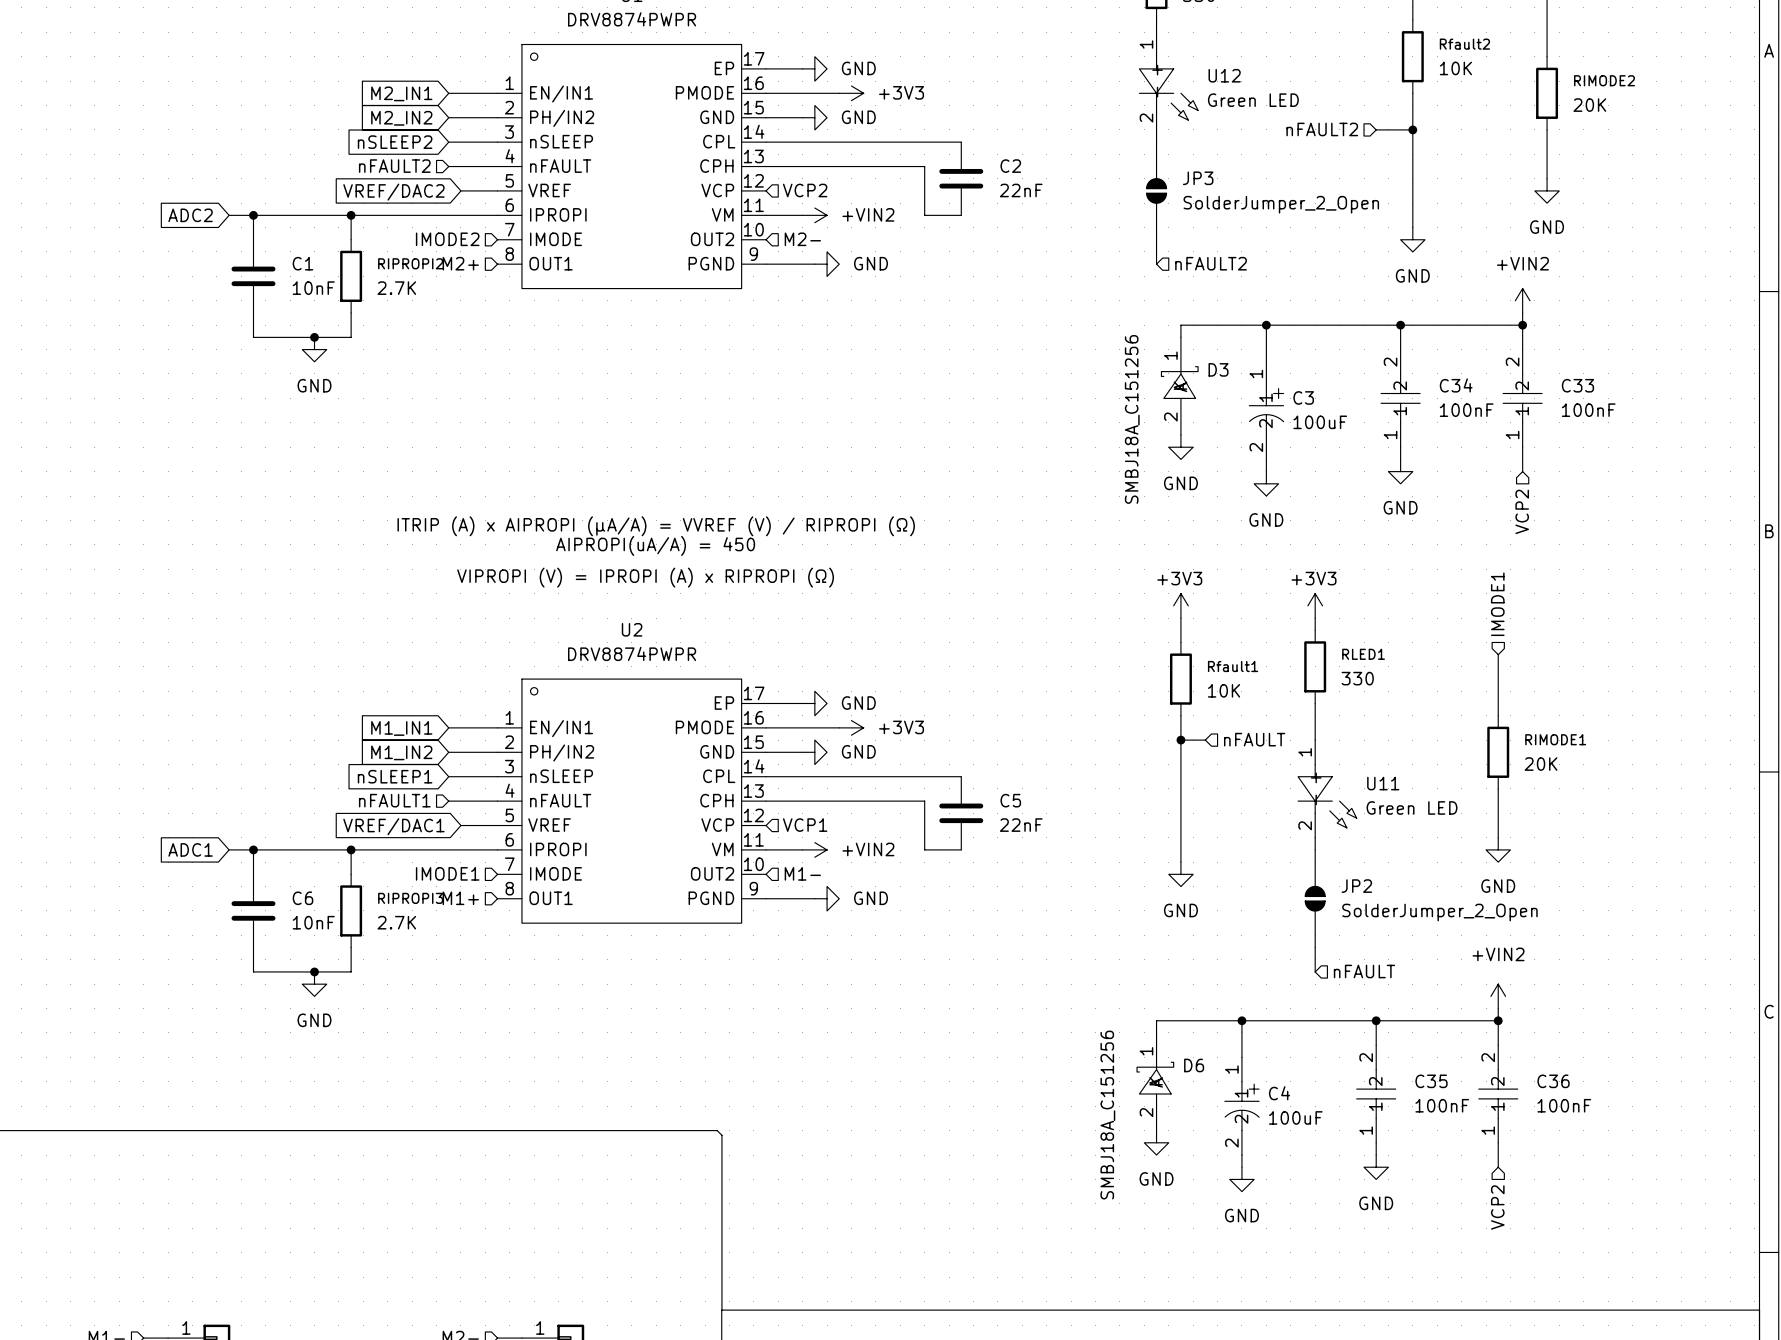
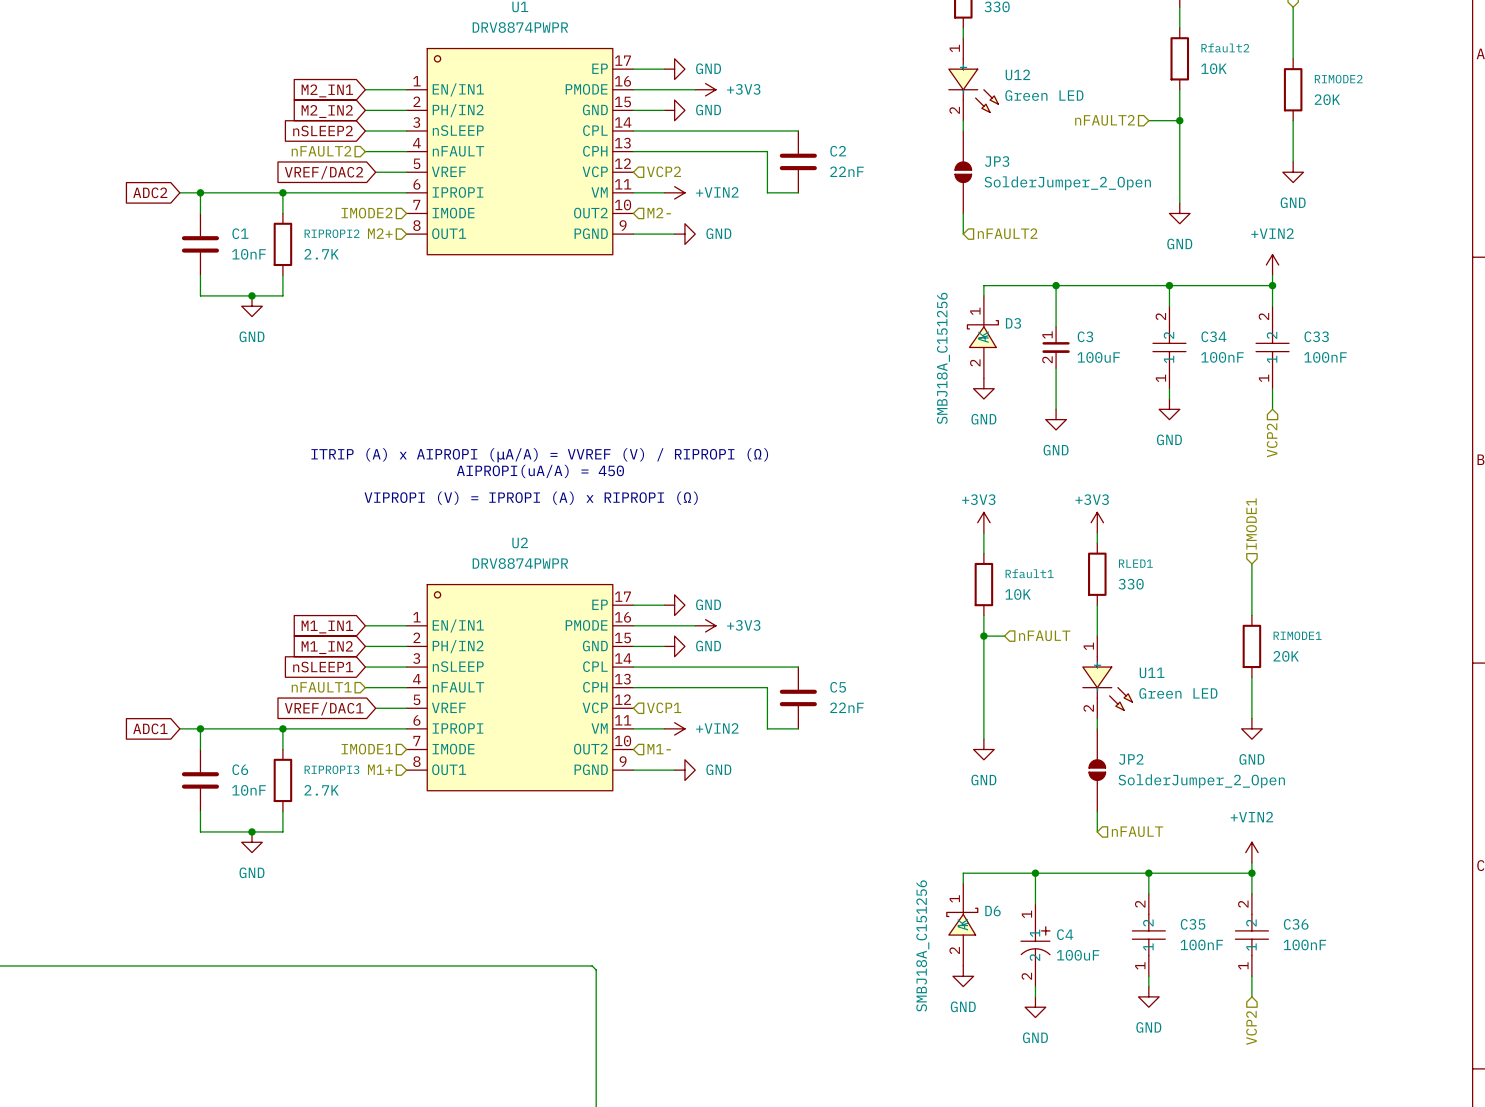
C3 symbol: [1249, 361, 1284, 460] -> [1042, 326, 1070, 369]

